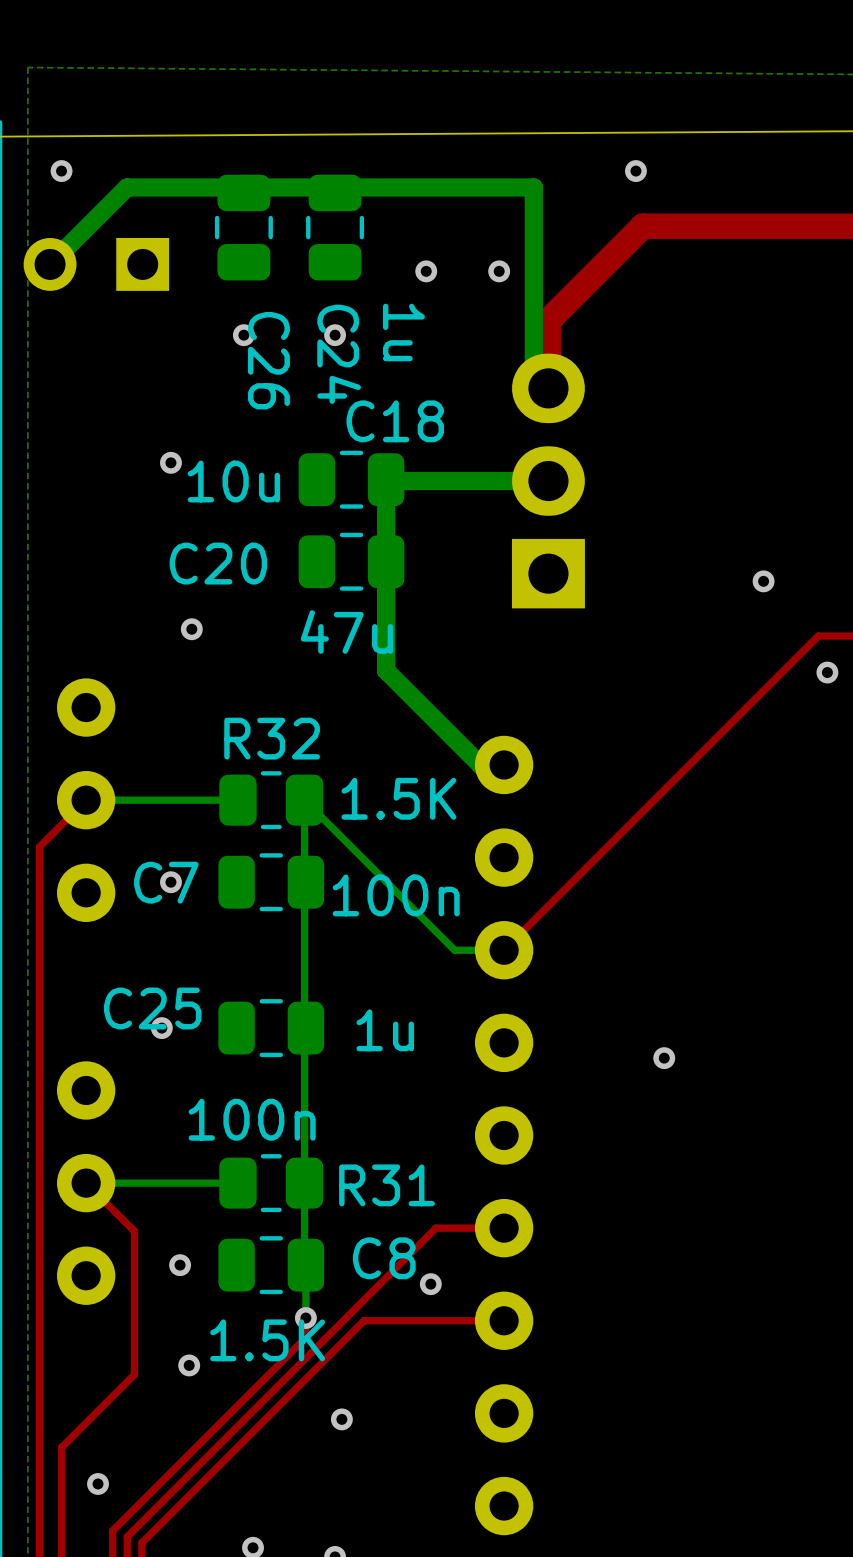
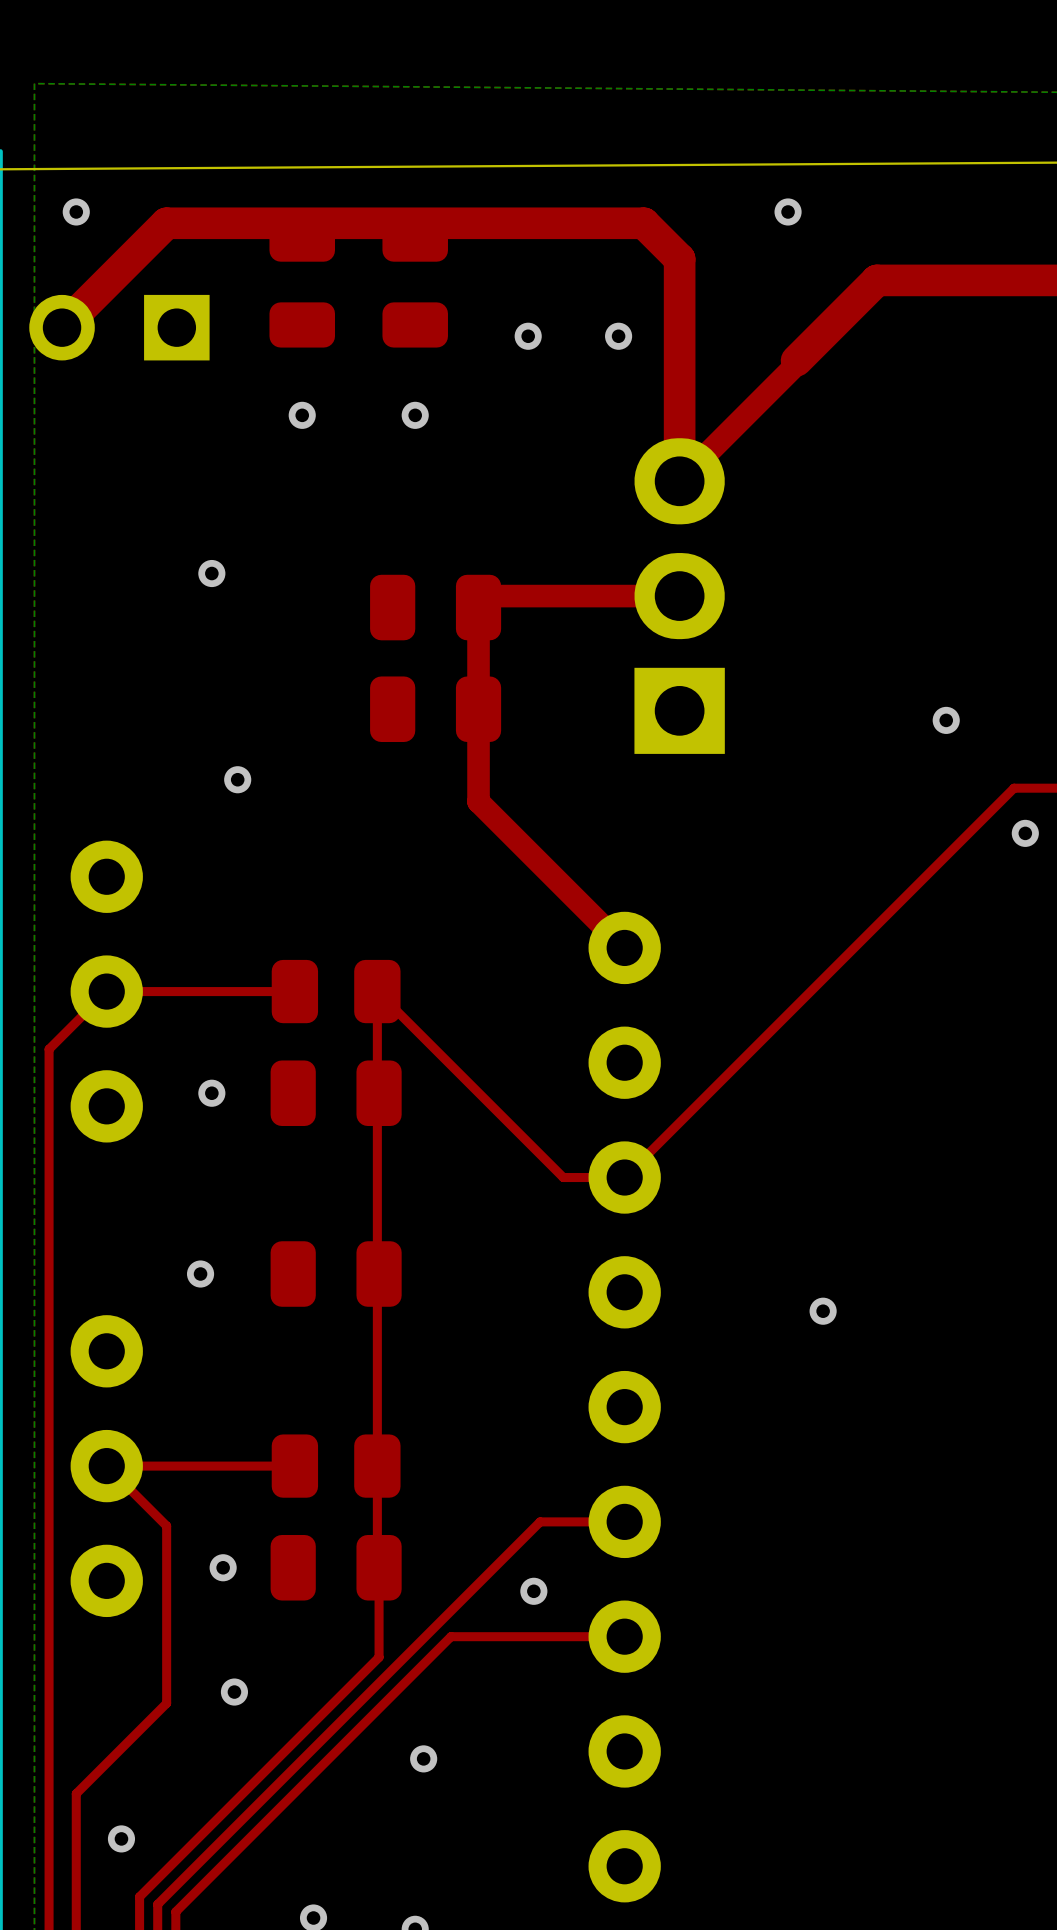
top track: (707, 226) (642, 226) (548, 320) -> (876, 280) (796, 360) (796, 364) (679, 481)
C26 side: bottom (243, 227) -> top (302, 282)
C24 side: bottom (335, 227) -> top (415, 282)
top track: none -> (62, 327) (166, 223) (643, 223) (679, 259) (679, 397)
bottom track: (50, 264) (127, 187) (533, 187) (533, 373) (548, 388) -> none
C18 side: bottom (351, 479) -> top (435, 709)
top track: none -> (679, 596) (490, 596) (478, 607) (478, 801) (624, 947)
bottom track: (548, 481) (386, 479) (386, 670) (480, 764) (504, 764) -> none
C20 side: bottom (351, 561) -> top (435, 607)
top track: none -> (294, 991) (106, 991)
bottom track: (237, 800) (86, 800) -> none
R32 side: bottom (271, 800) -> top (336, 991)
C7 side: bottom (271, 882) -> top (336, 1093)
top track: none -> (624, 1177) (563, 1177) (377, 991) (377, 1566) (379, 1567) (379, 1633)
bottom track: (504, 950) (454, 950) (304, 800) (305, 1318) -> none
C25 side: bottom (271, 1028) -> top (336, 1274)
top track: none -> (294, 1466) (106, 1466)
bottom track: (237, 1183) (86, 1183) -> none
R31 side: bottom (271, 1183) -> top (336, 1466)
C8 side: bottom (271, 1265) -> top (336, 1567)
via: (305, 1318) -> none

